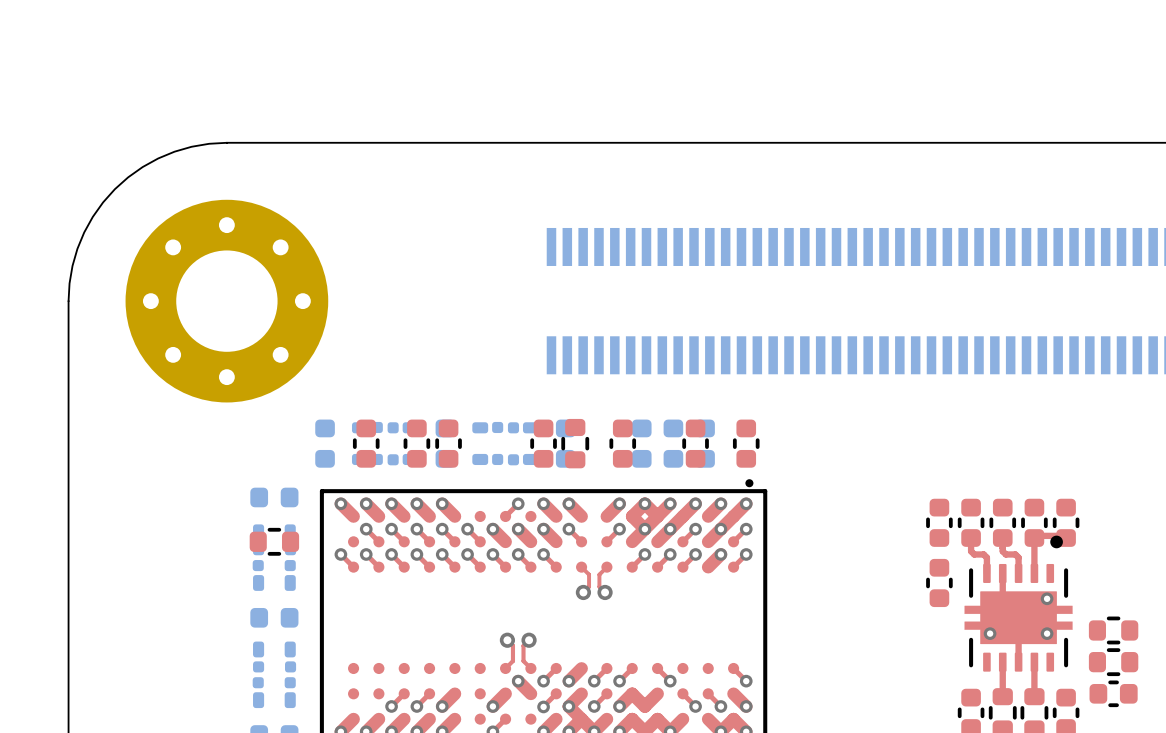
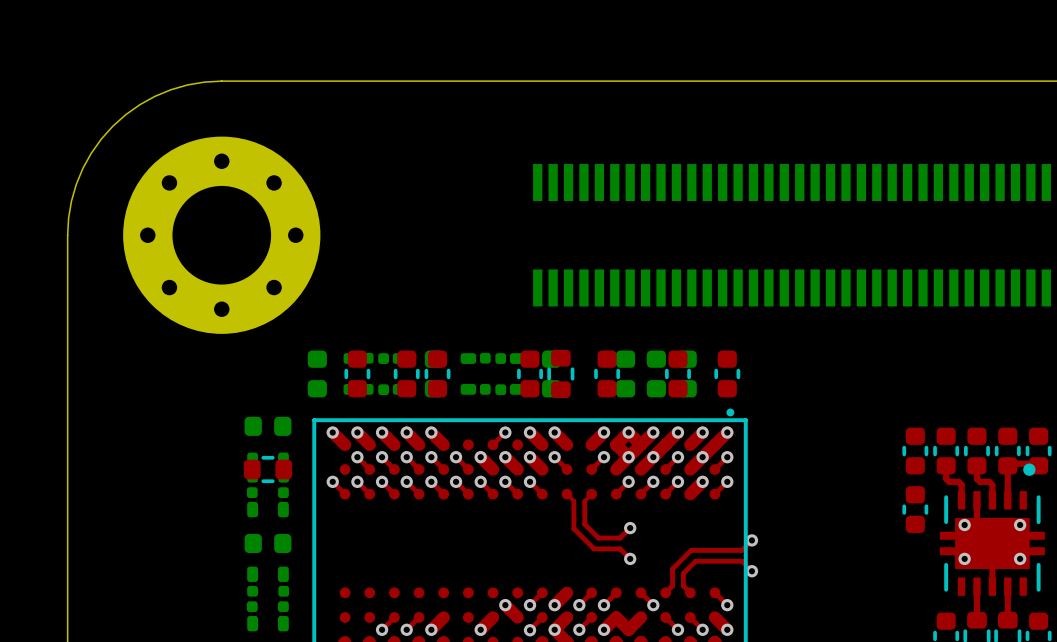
top track: (589, 574) (589, 586) (583, 592) -> (573, 501) (573, 528) (594, 548) (620, 548) (630, 558)
top track: (599, 574) (599, 586) (605, 592) -> (584, 501) (584, 524) (598, 538) (620, 538) (630, 528)
via: (583, 592) -> none
via: (605, 592) -> none
via: none -> (964, 524)
via: none -> (630, 528)
top track: none -> (751, 540) (741, 550) (691, 550) (672, 568) (672, 585) (665, 592)
via: none -> (751, 540)
via: none -> (630, 558)
top track: (507, 640) (512, 645) (512, 661) (505, 668) -> none
via: (507, 640) -> none
top track: (529, 640) (523, 645) (523, 661) (530, 668) -> none
via: (529, 640) -> none
top track: none -> (751, 571) (741, 561) (695, 561) (683, 573) (683, 585) (690, 592)
via: none -> (751, 571)

